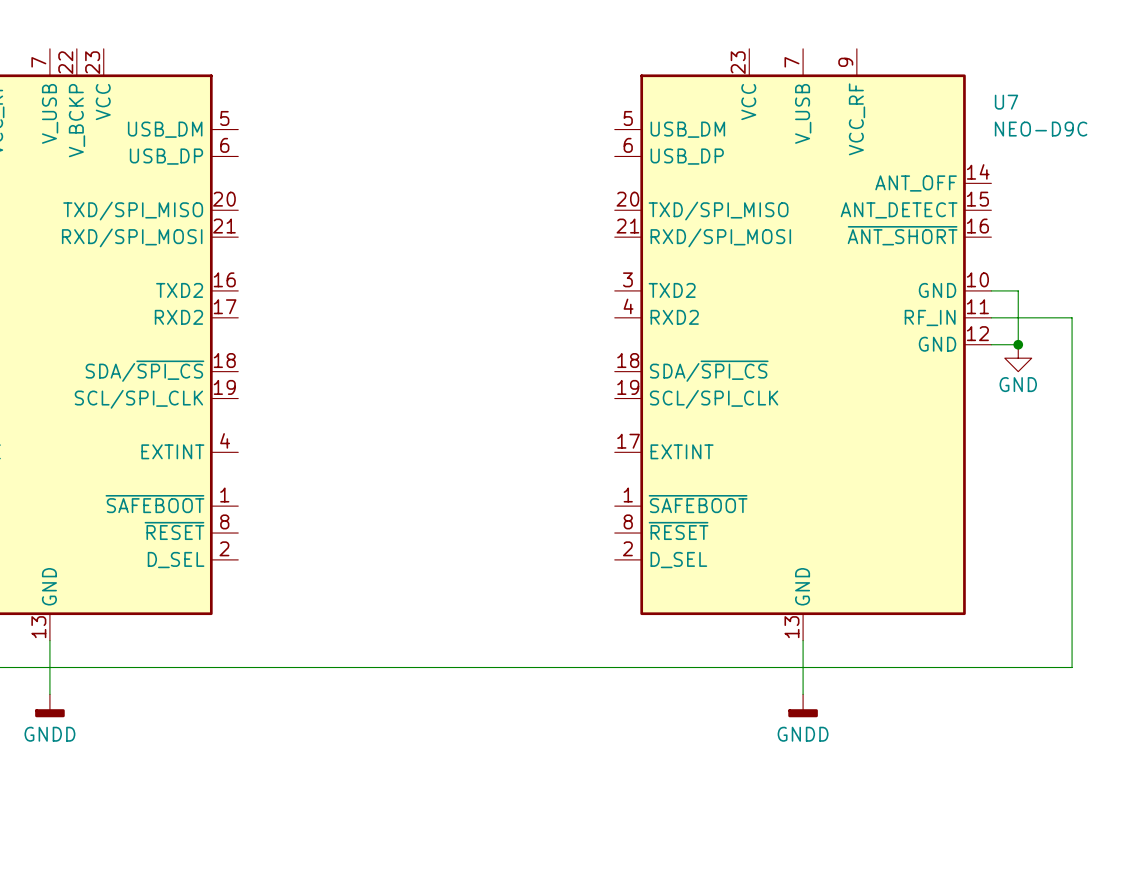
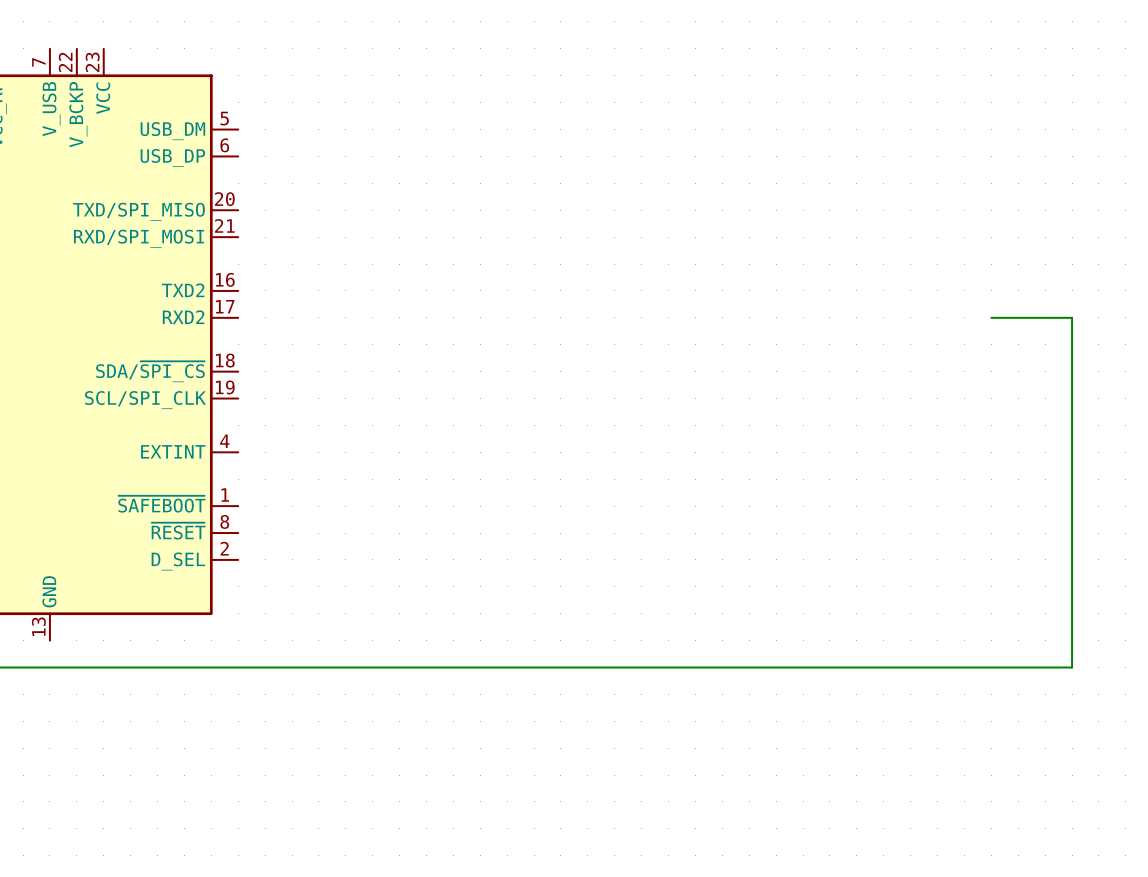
wire: (991, 290) (1018, 290) (1018, 344) (991, 344) -> none
U7: NEO-D9C (803, 344) -> none
junction: (1018, 344) -> none
power symbol: GND (1018, 358) -> none
wire: (49, 640) (49, 694) -> none
wire: (803, 640) (803, 694) -> none
power symbol: GNDD (49, 705) -> none
power symbol: GNDD (803, 705) -> none

